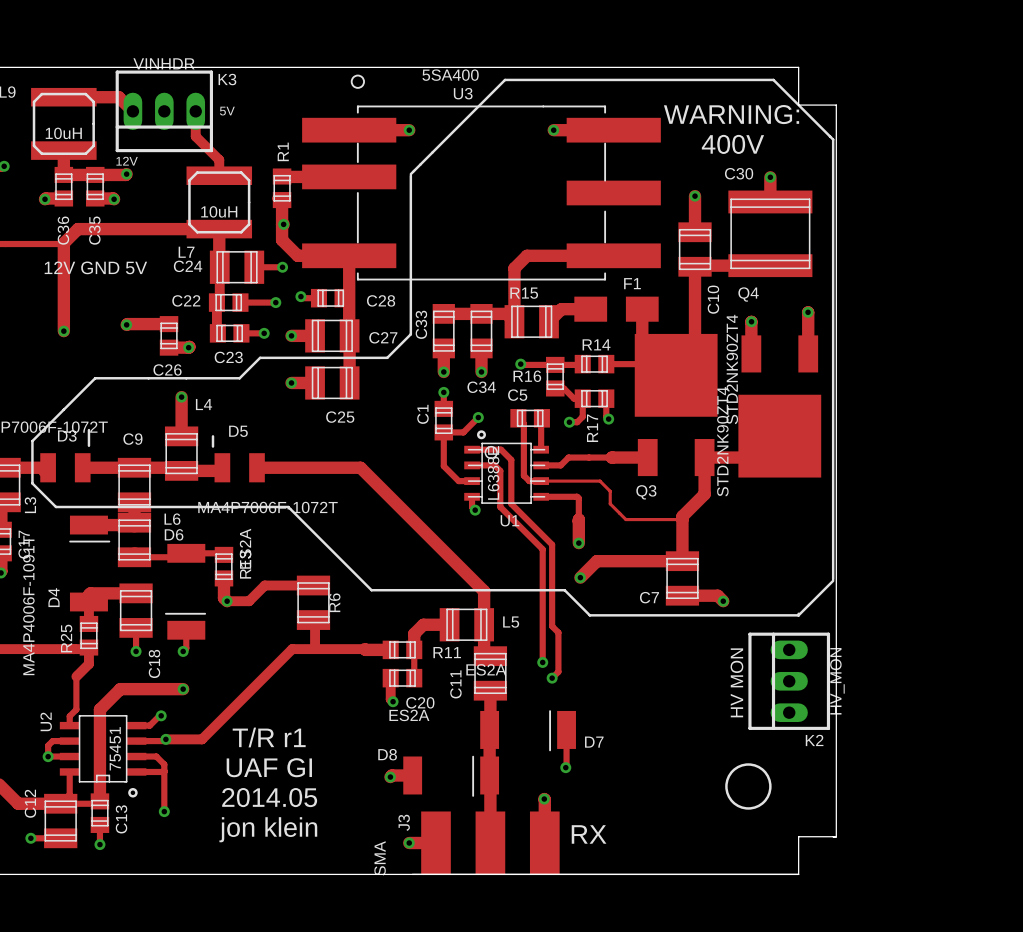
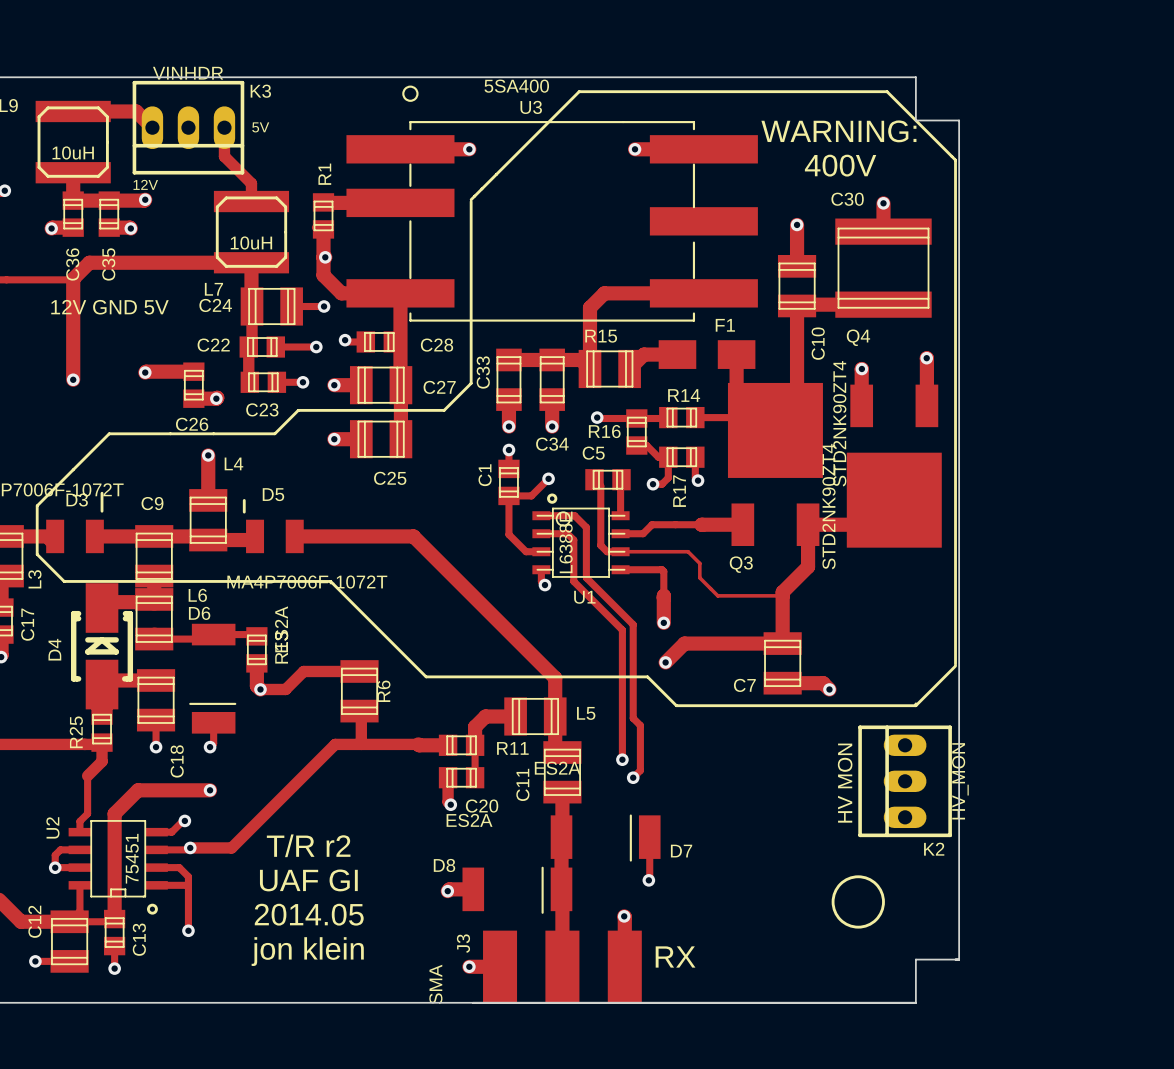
D4 footprint: [69, 515, 111, 612] -> [70, 583, 134, 710]
D4 name position: D4 (54, 597) -> D4 (54, 649)
D4 value: MA4P4006F-1091T (28, 605) -> none
text: T/R r1 (269, 737) -> T/R r2 (308, 845)

